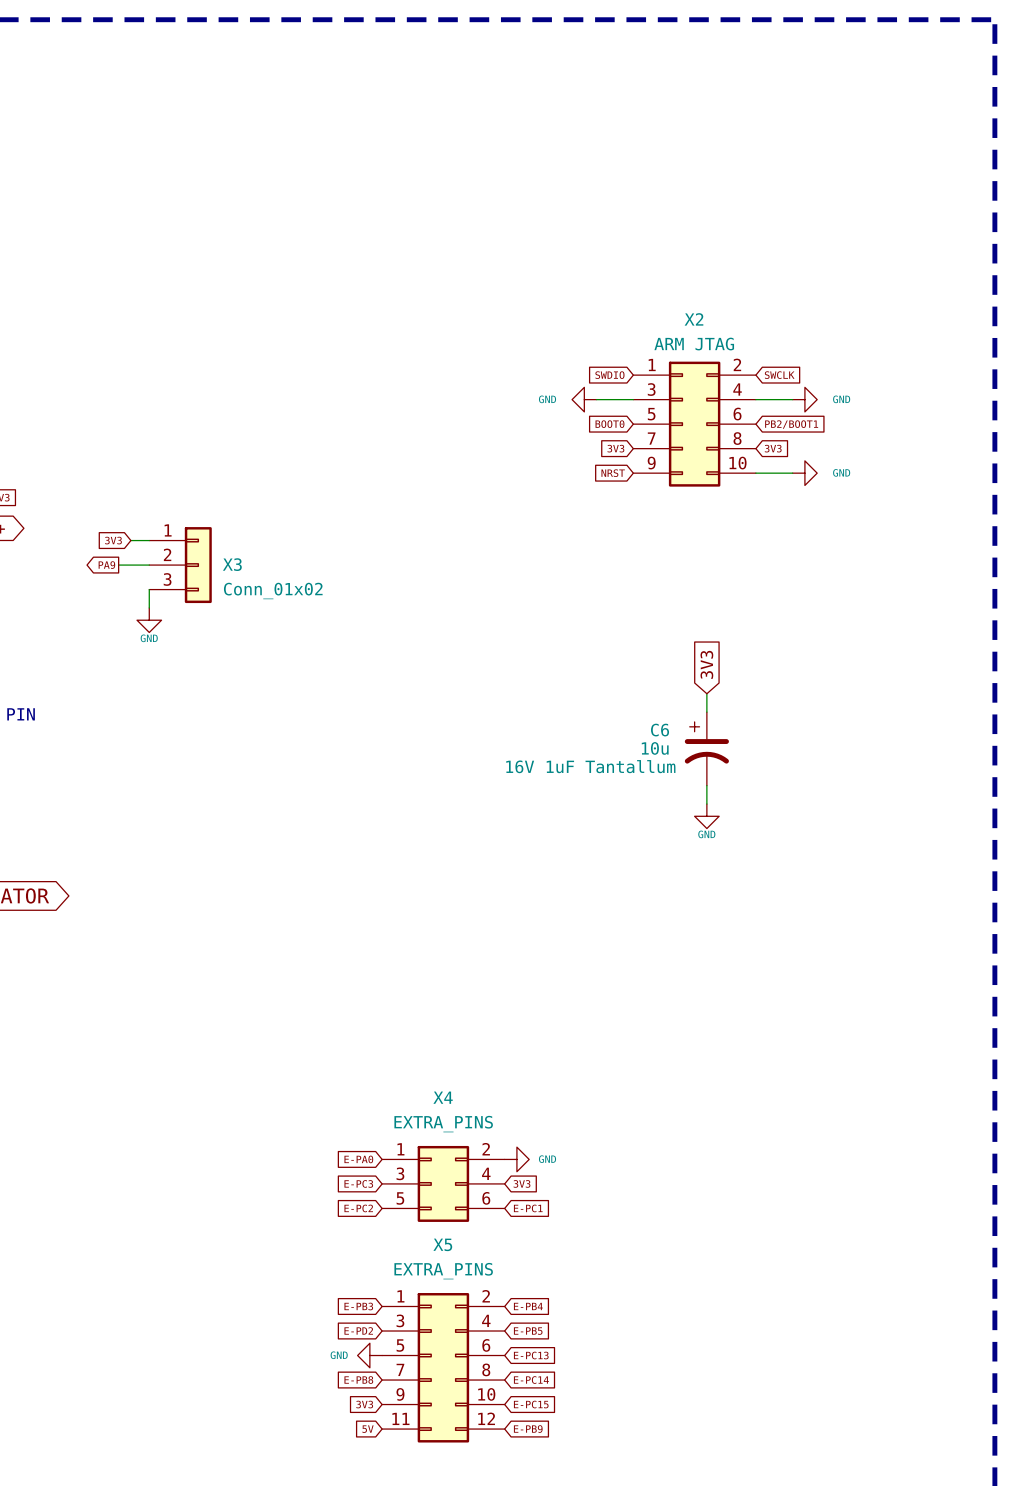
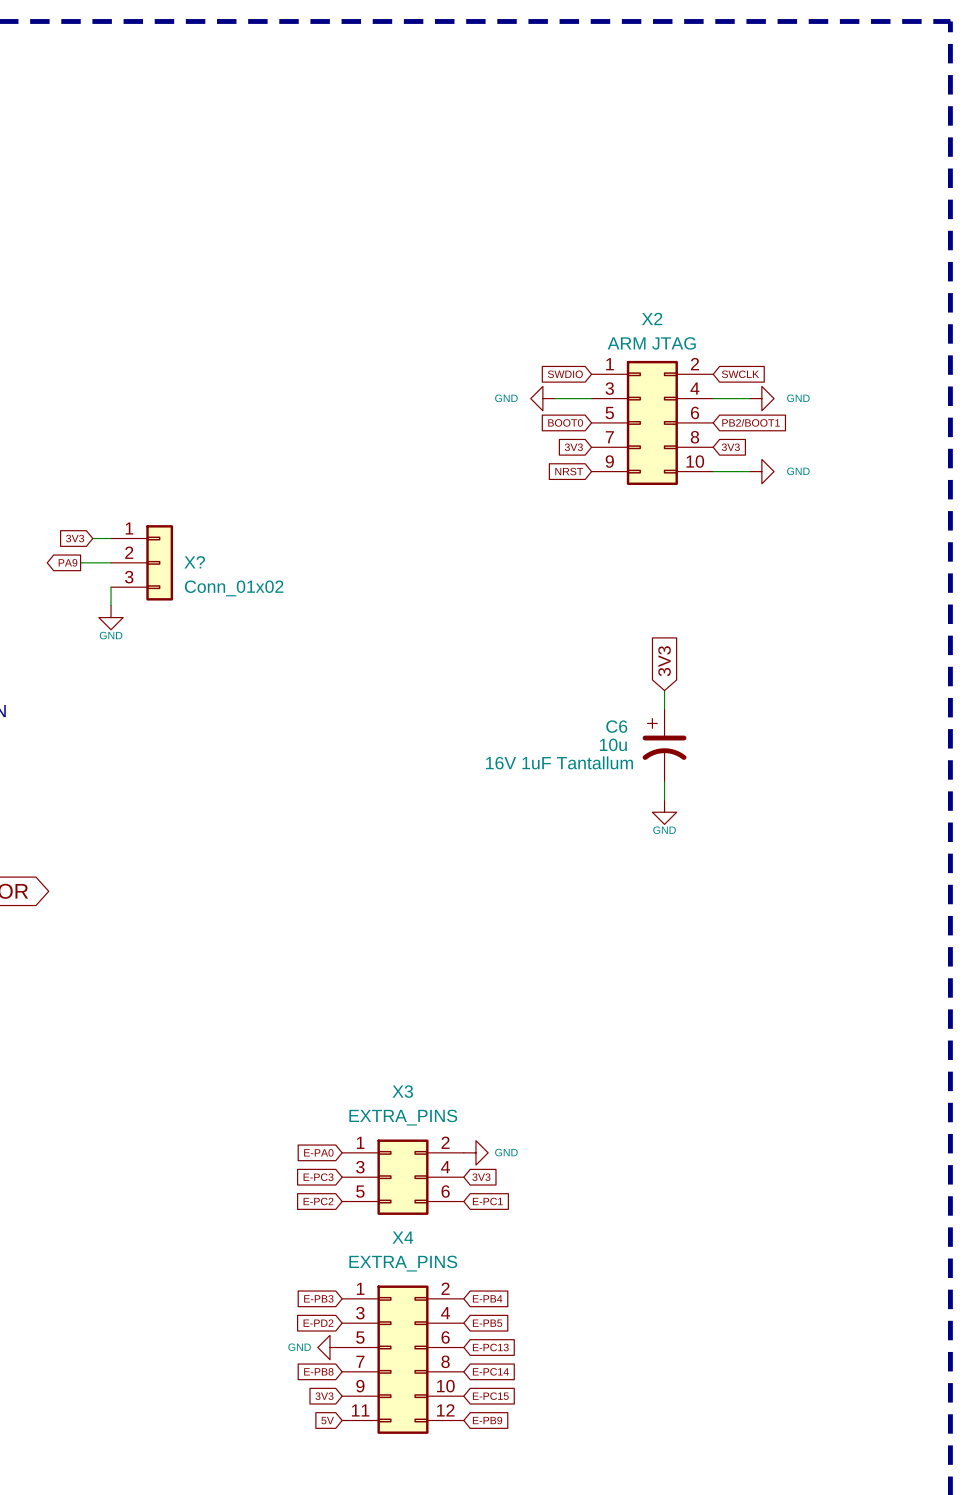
X3 name: X3 (232, 564) -> X? (194, 562)
X4 name: X4 (443, 1097) -> X3 (402, 1091)
X5 name: X5 (442, 1244) -> X4 (402, 1237)

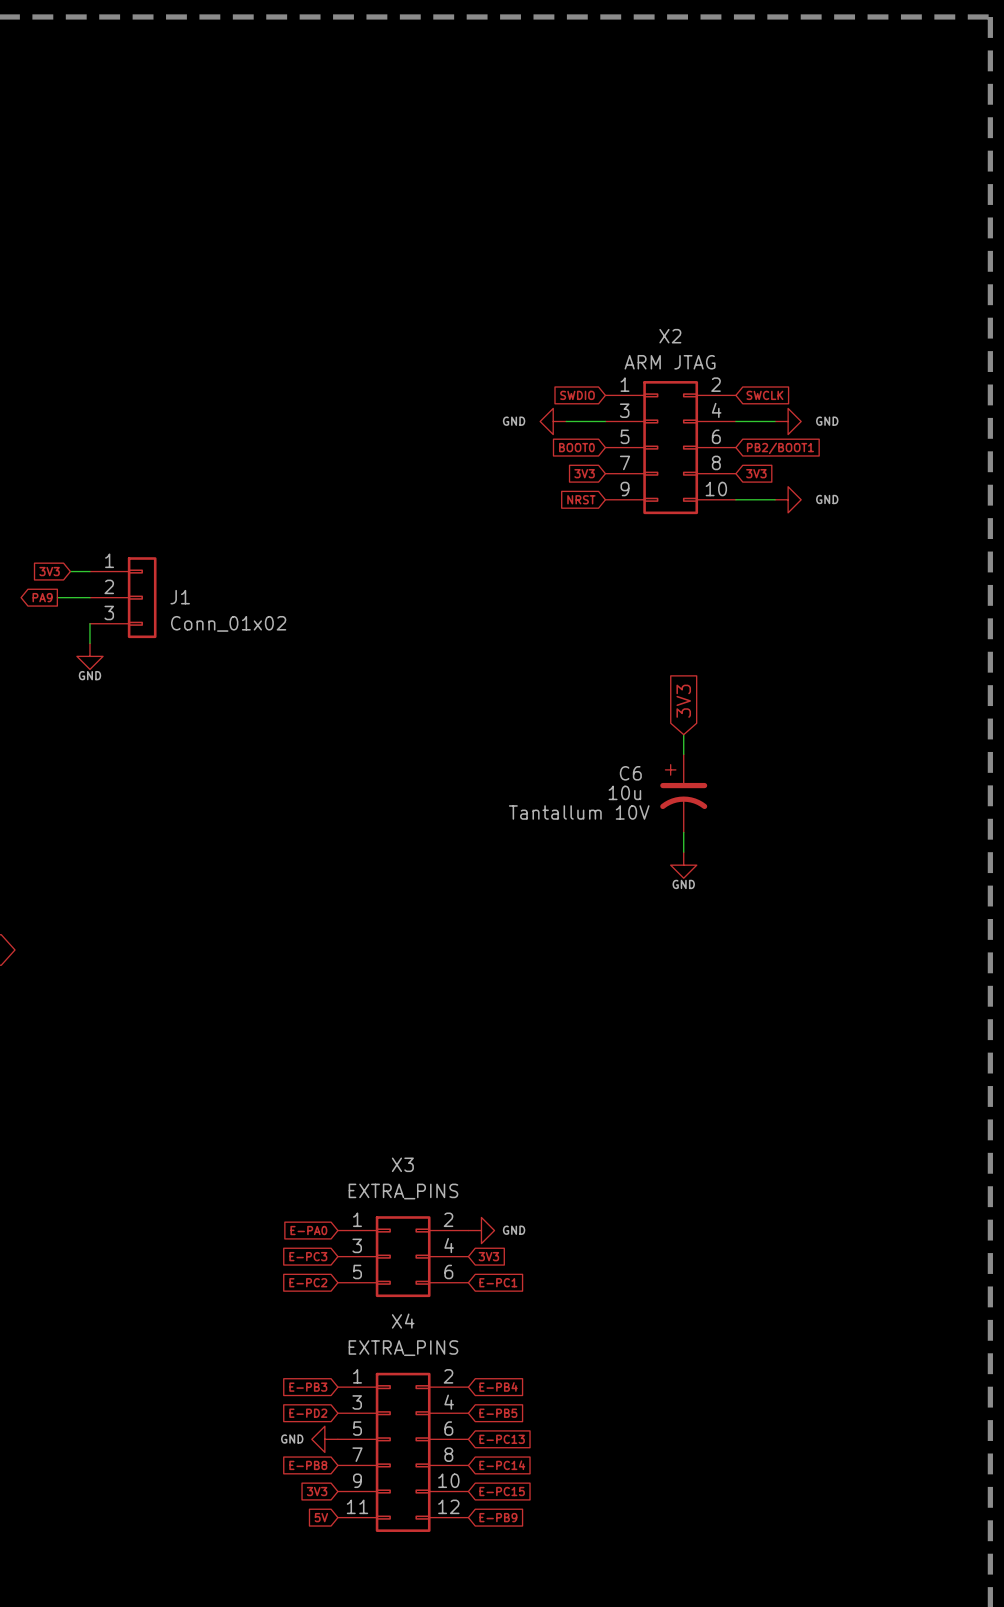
X? name: X? (194, 562) -> J1 (180, 597)
C6 text: 16V 1uF Tantallum (559, 762) -> Tantallum 10V (579, 812)

